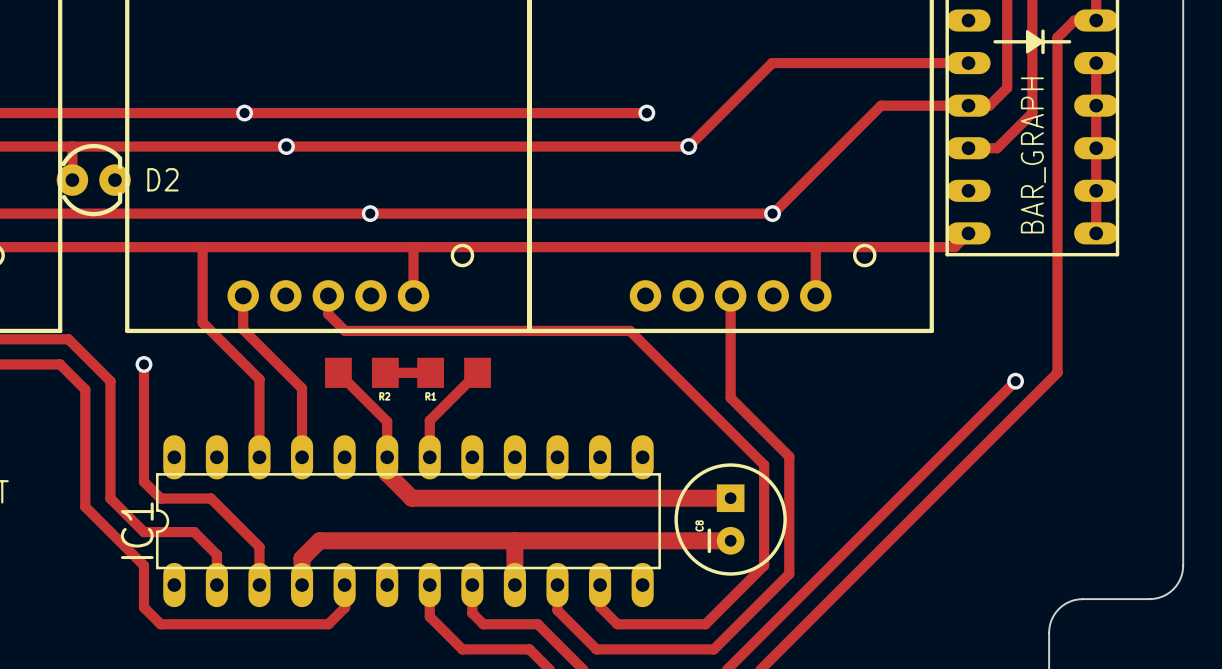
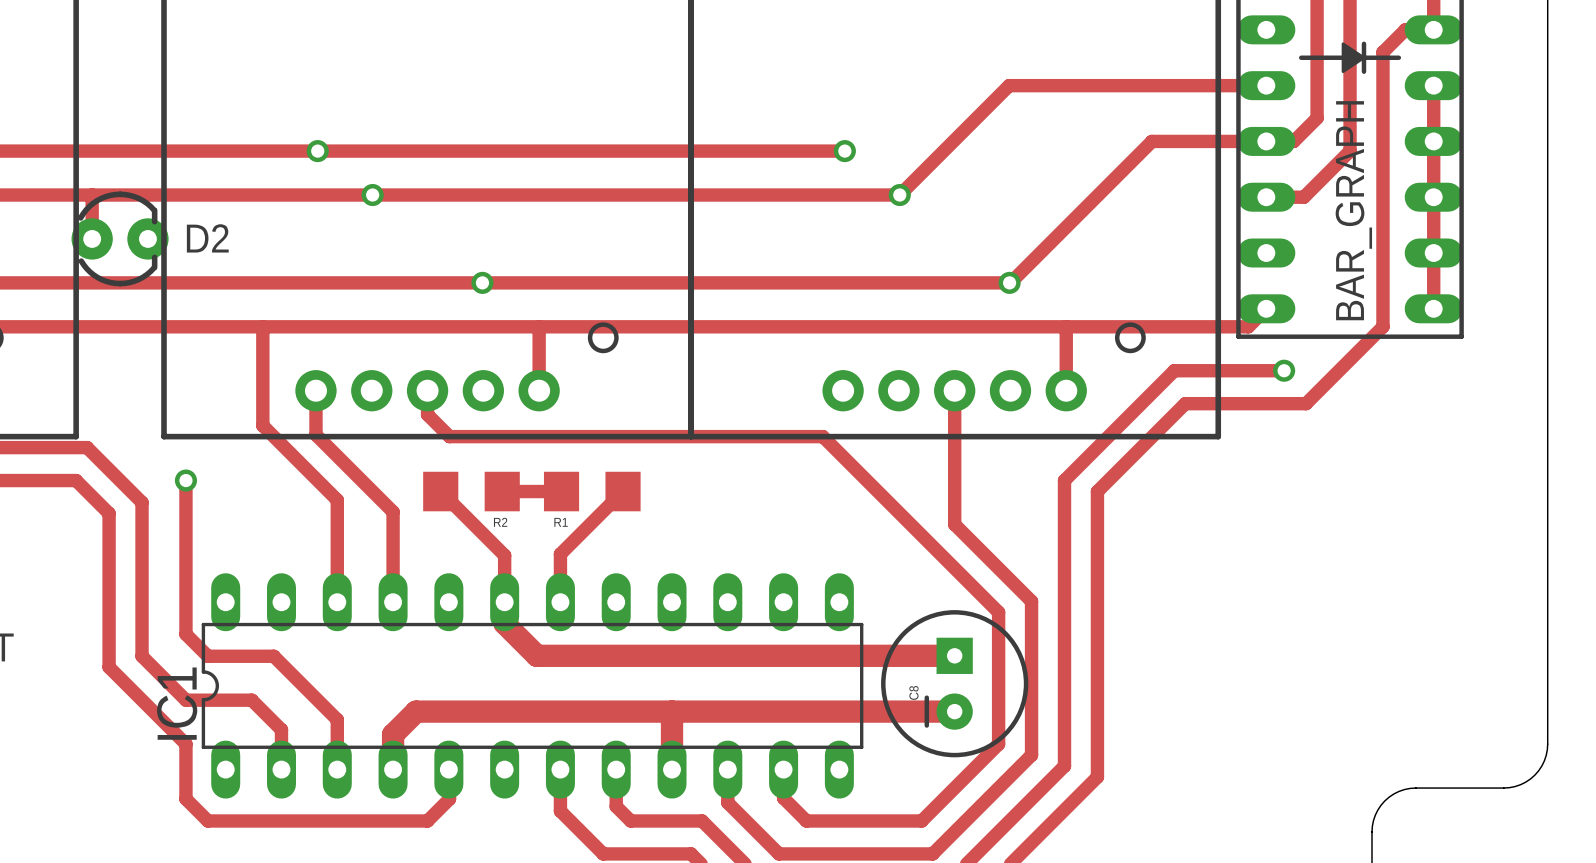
track: (1057, 247) (1057, 372) (839, 590) -> (1382, 326) (1306, 403) (1185, 403) (1097, 491) (1097, 777)
via: none -> (1284, 370)
track: (1015, 381) (814, 582) -> (1284, 370) (1174, 370) (1064, 480) (1064, 766)
via: (1015, 381) -> none

